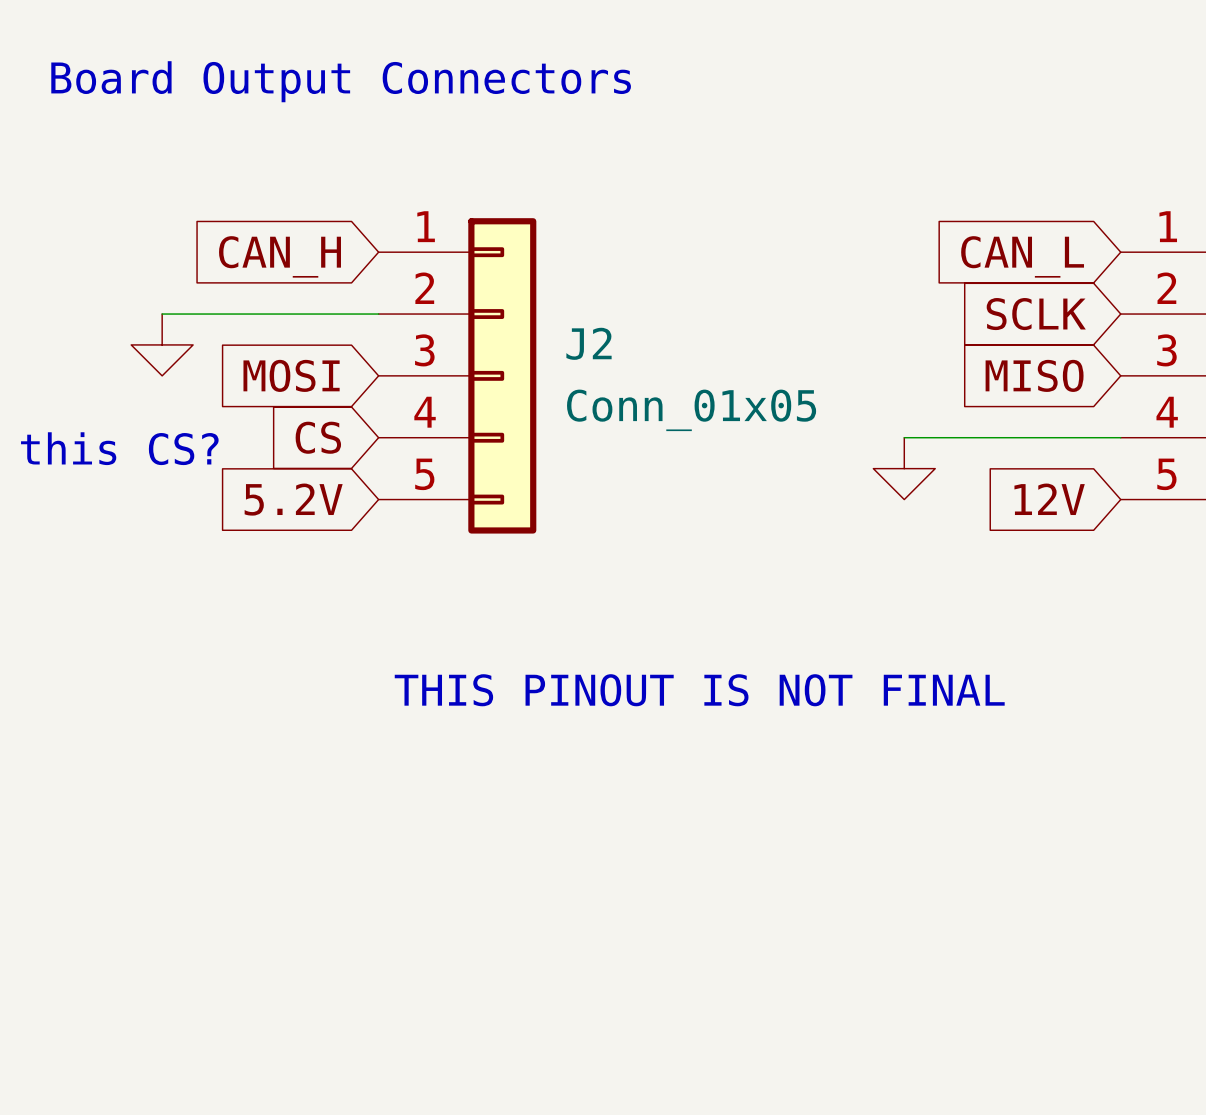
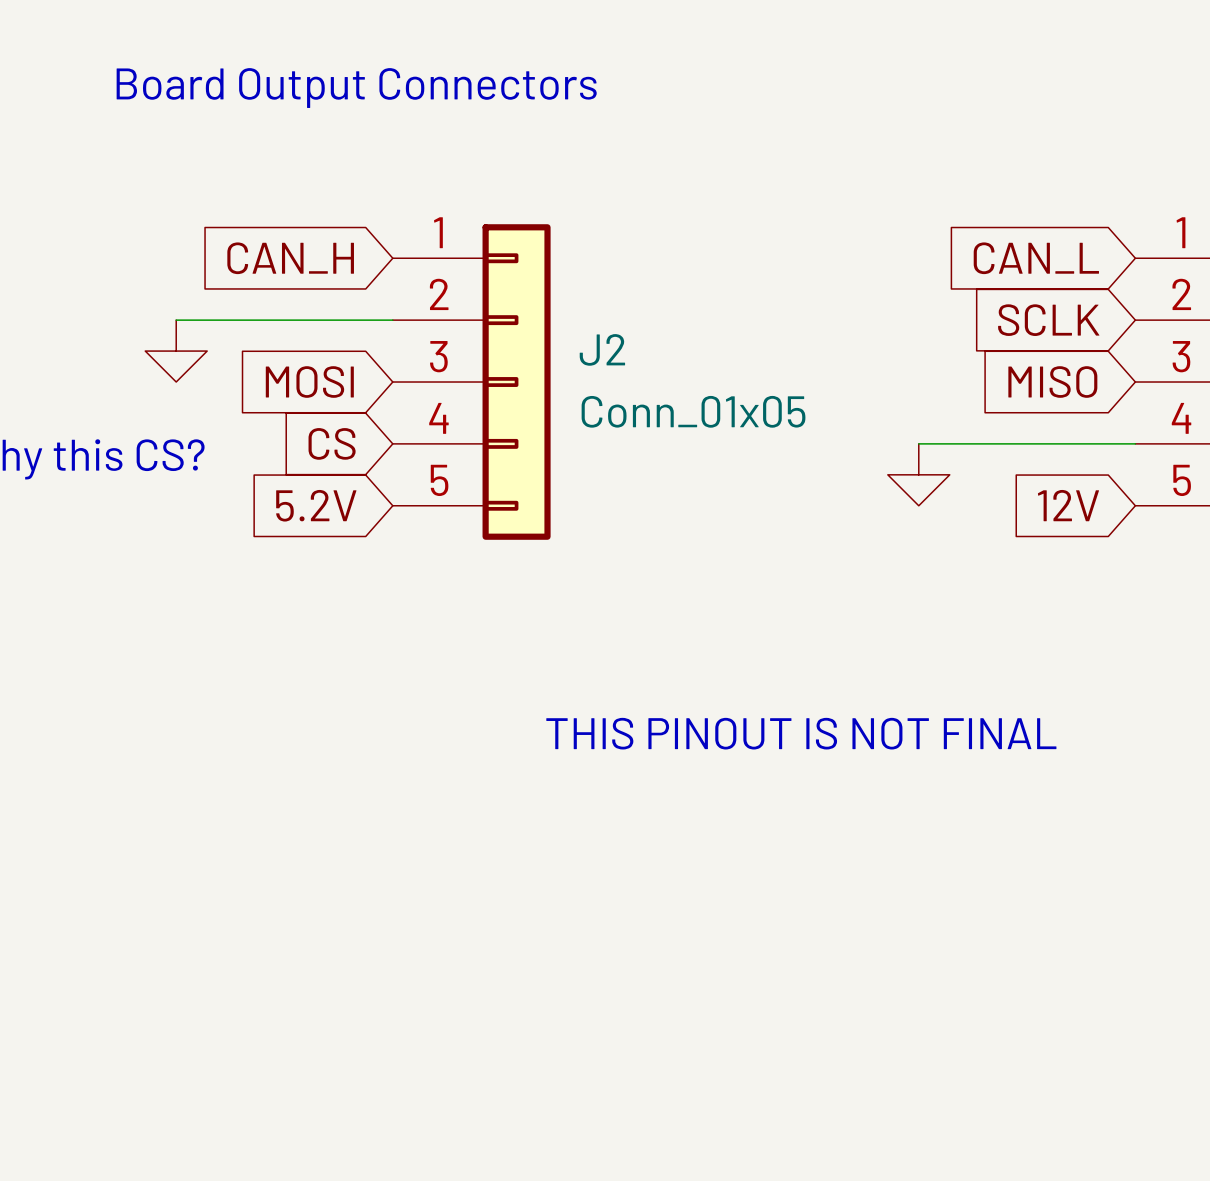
text position: THIS PINOUT IS NOT FINAL (699, 690) -> THIS PINOUT IS NOT FINAL (801, 733)

